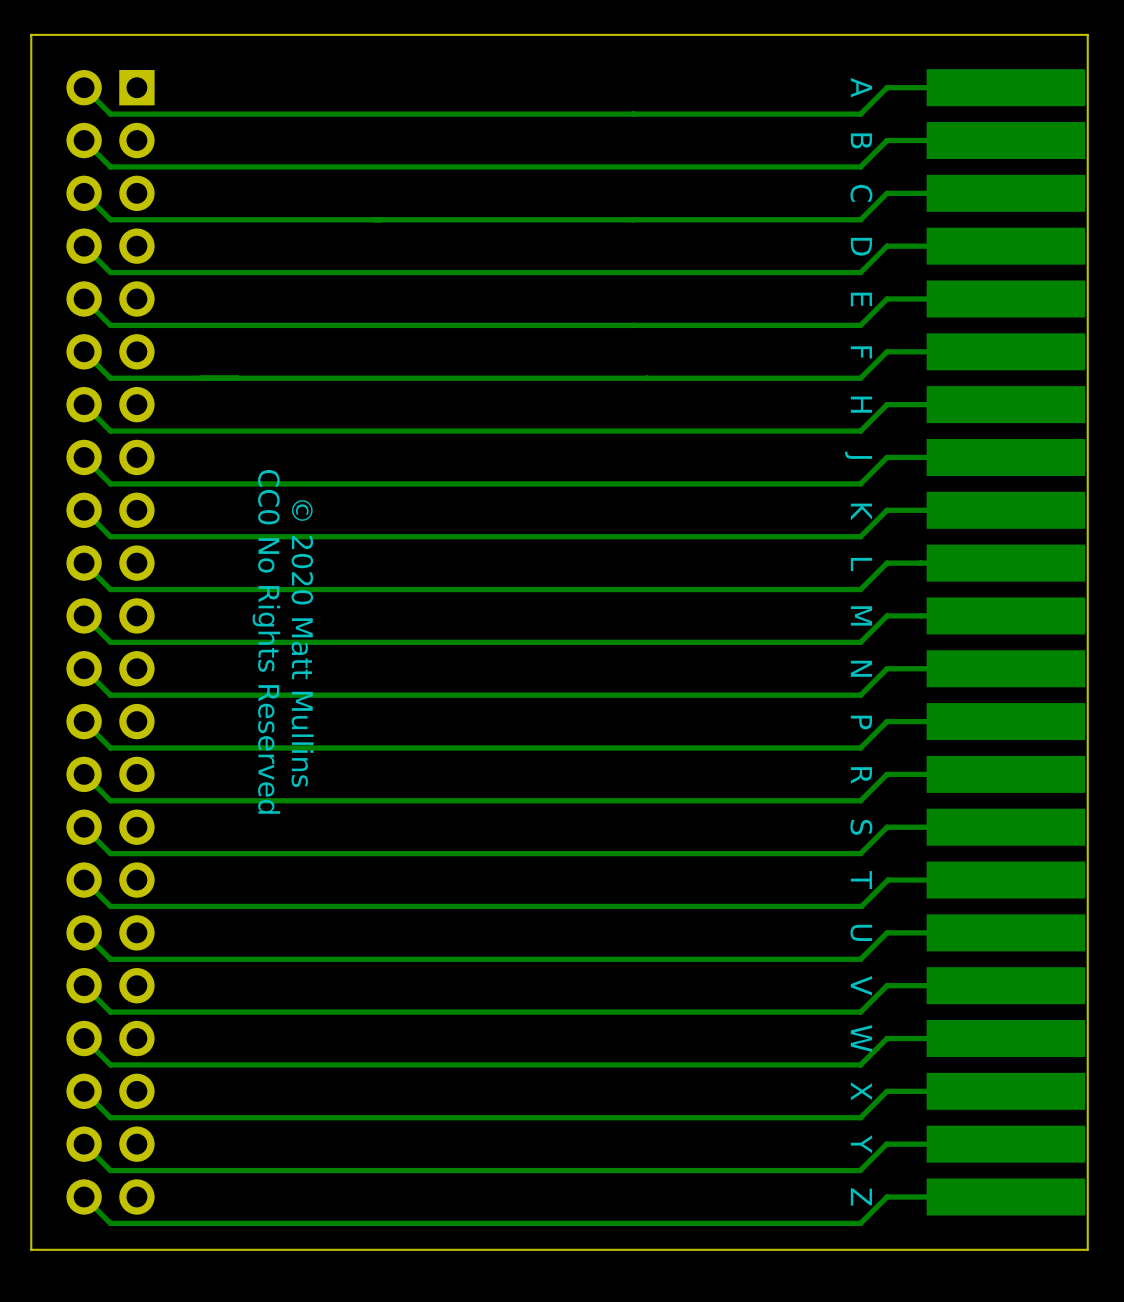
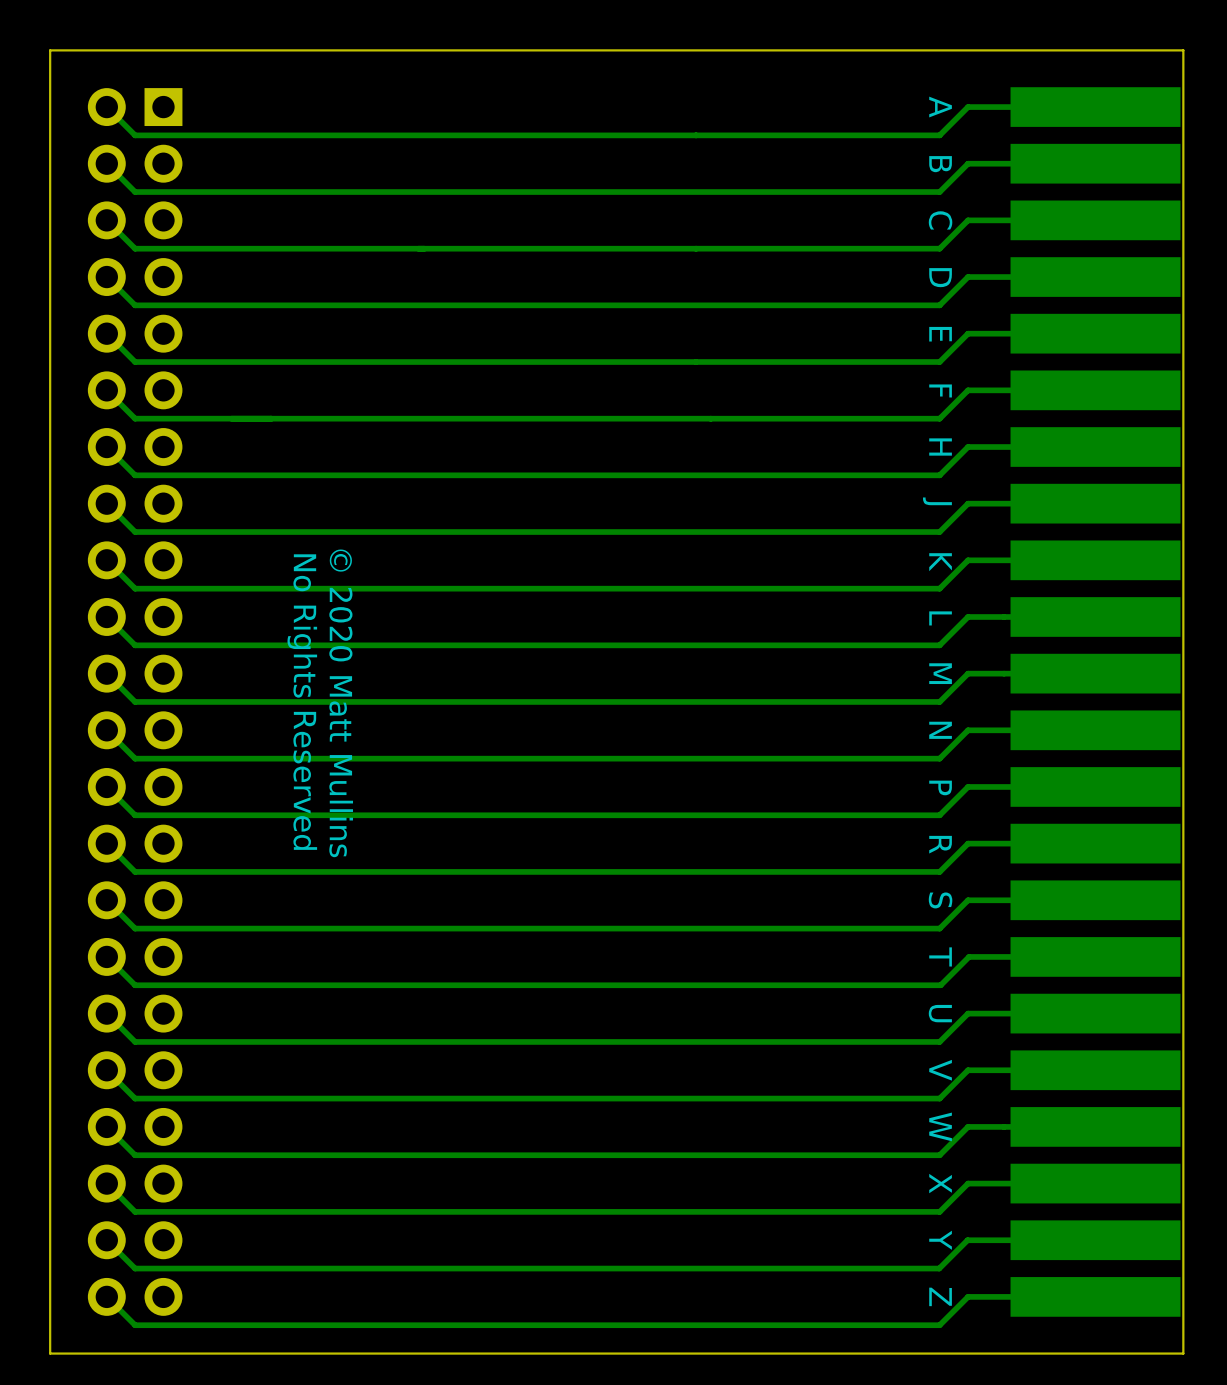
text: CC0 No Rights Reserved (266, 641) -> No Rights Reserved (302, 702)

